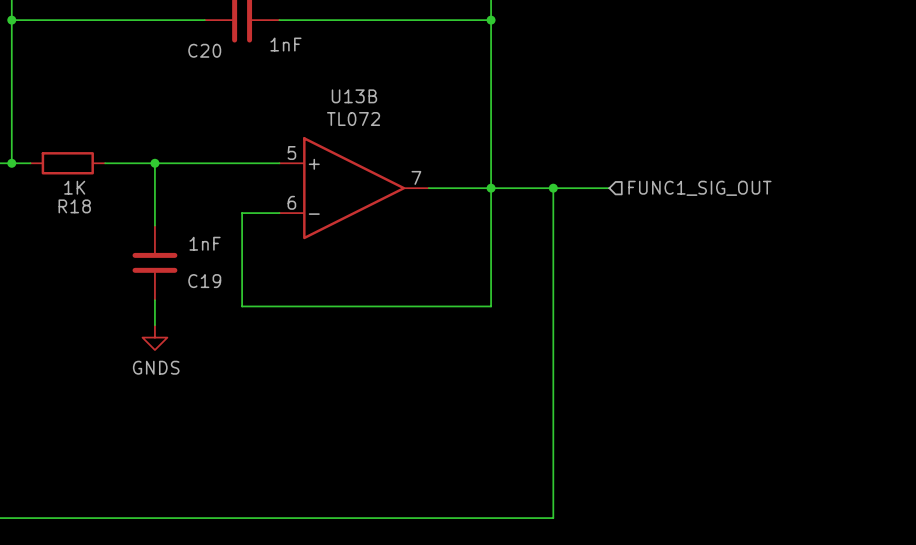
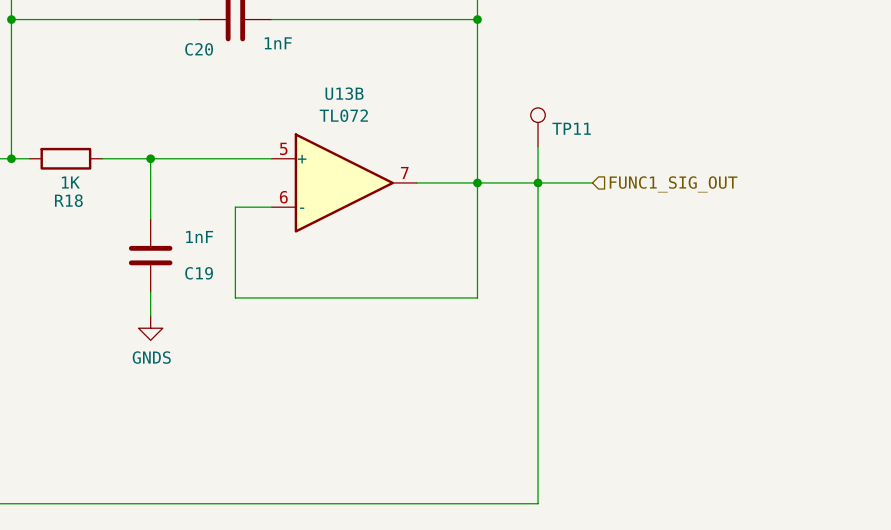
TP11: none -> (538, 127)
wire: none -> (538, 146) (538, 182)

